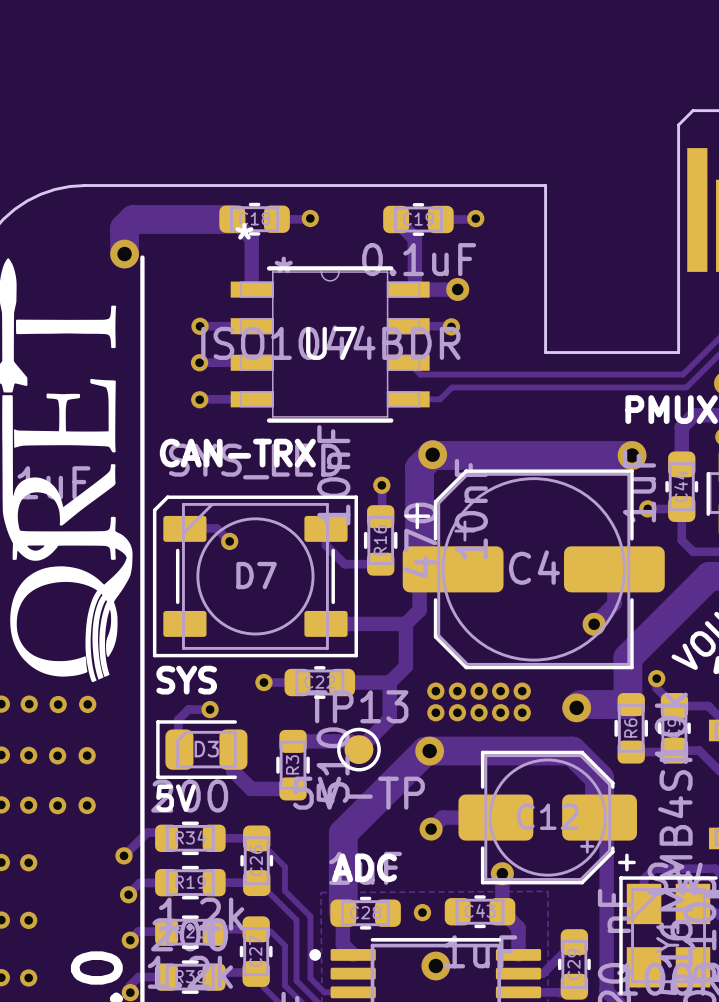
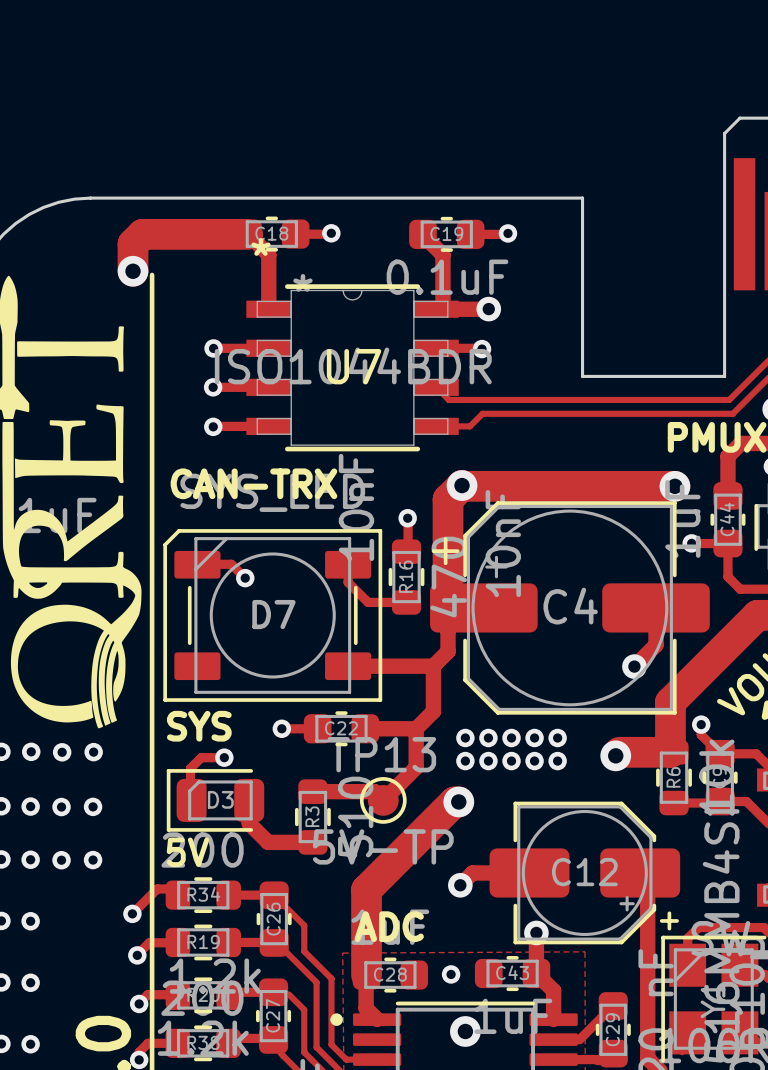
track: (429, 751) (572, 751) (599, 778) (599, 817) -> none

